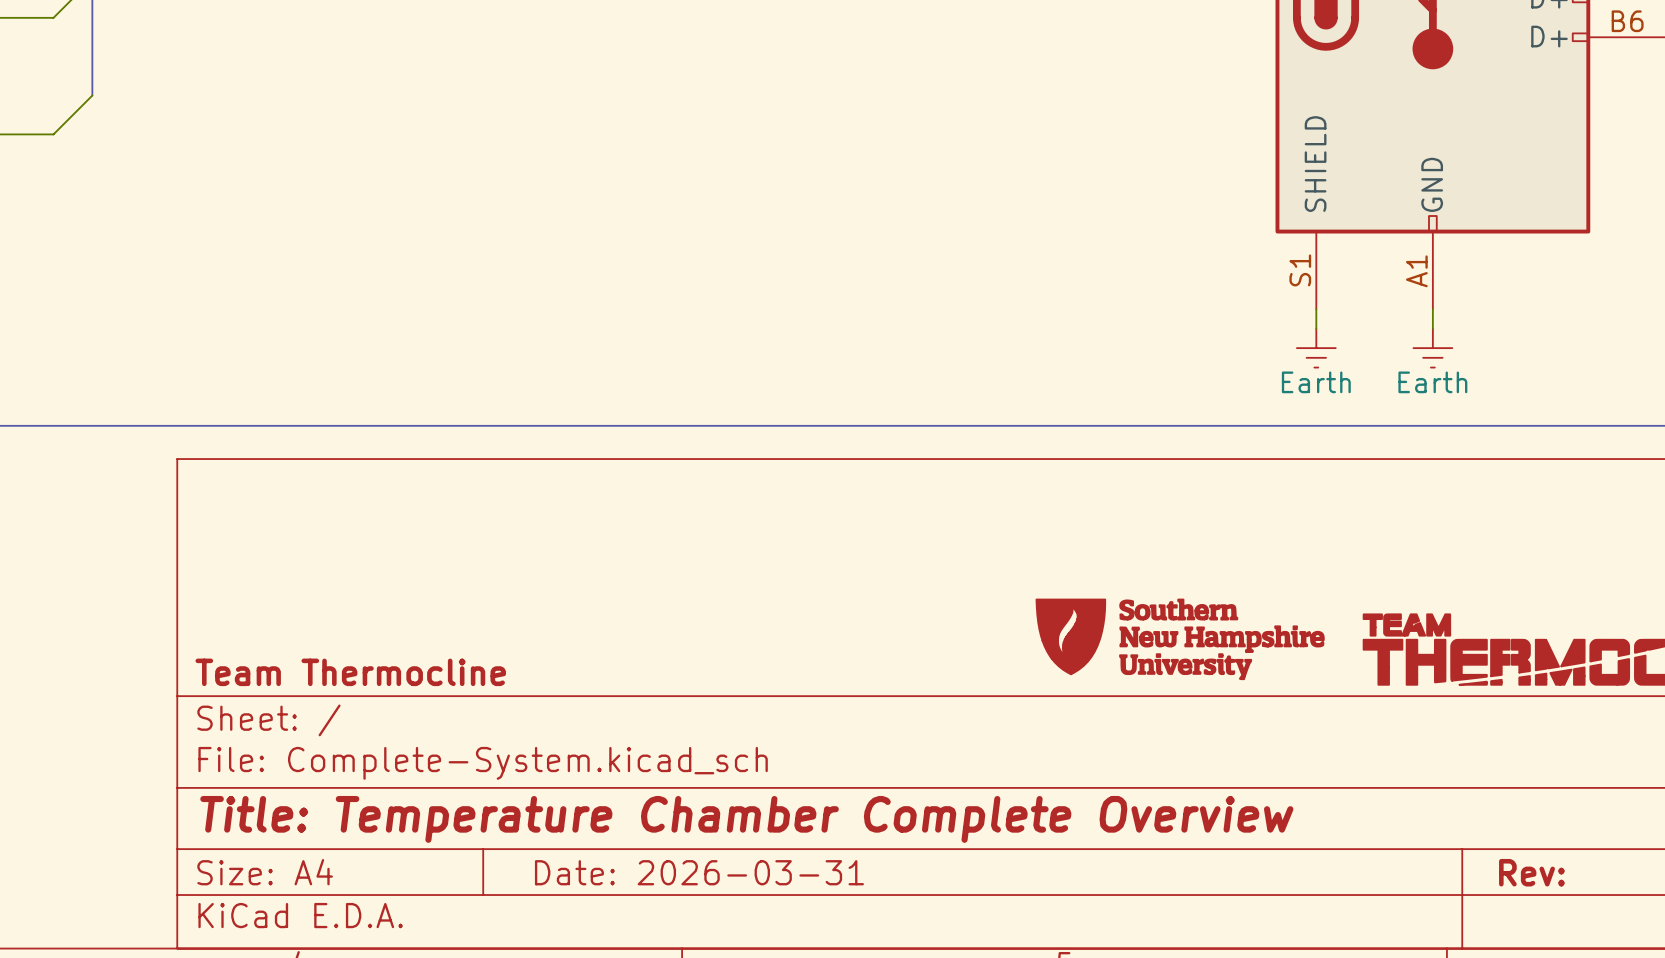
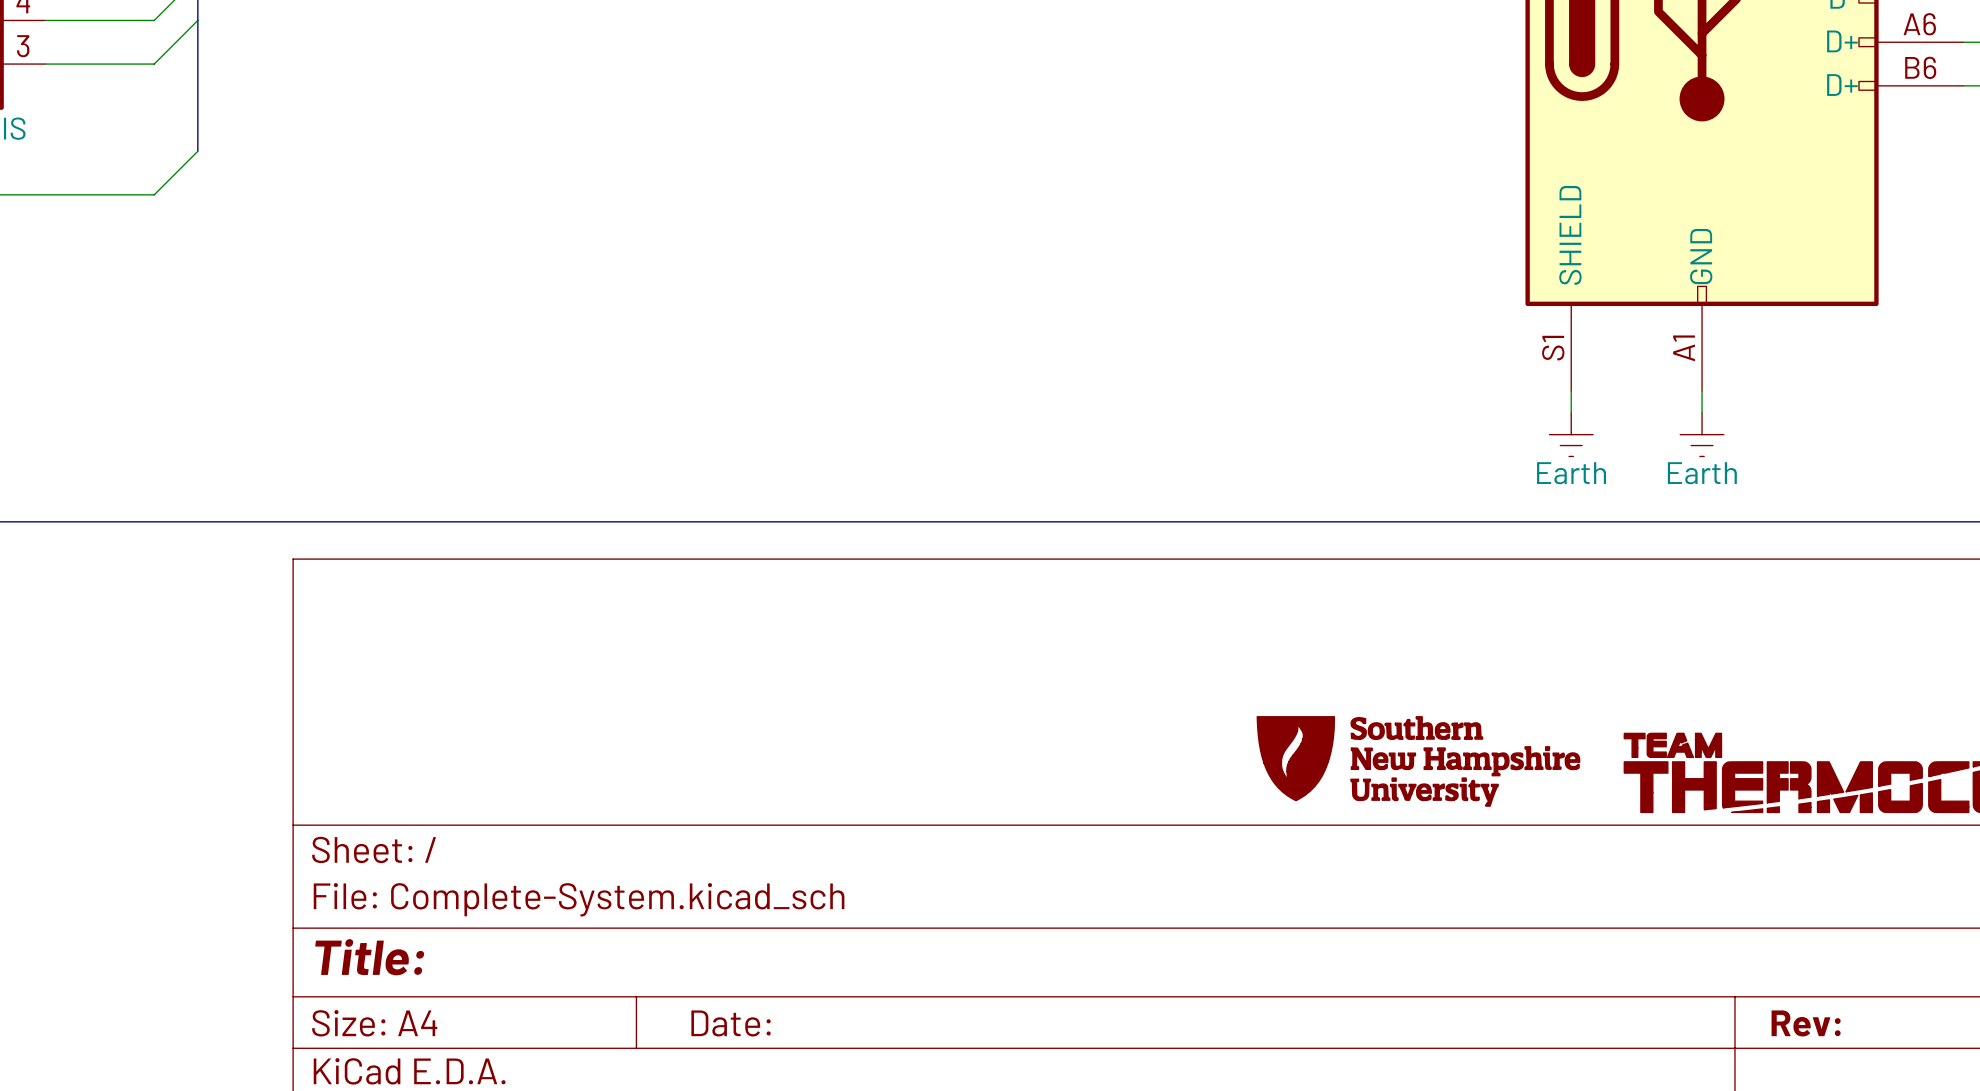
title block: Team Thermocline (350, 672) -> none
title block: Title: Temperature Chamber Complete Overview (746, 819) -> Title: (369, 957)
title block: Date: 2026-03-31 (699, 872) -> Date: (731, 1023)

